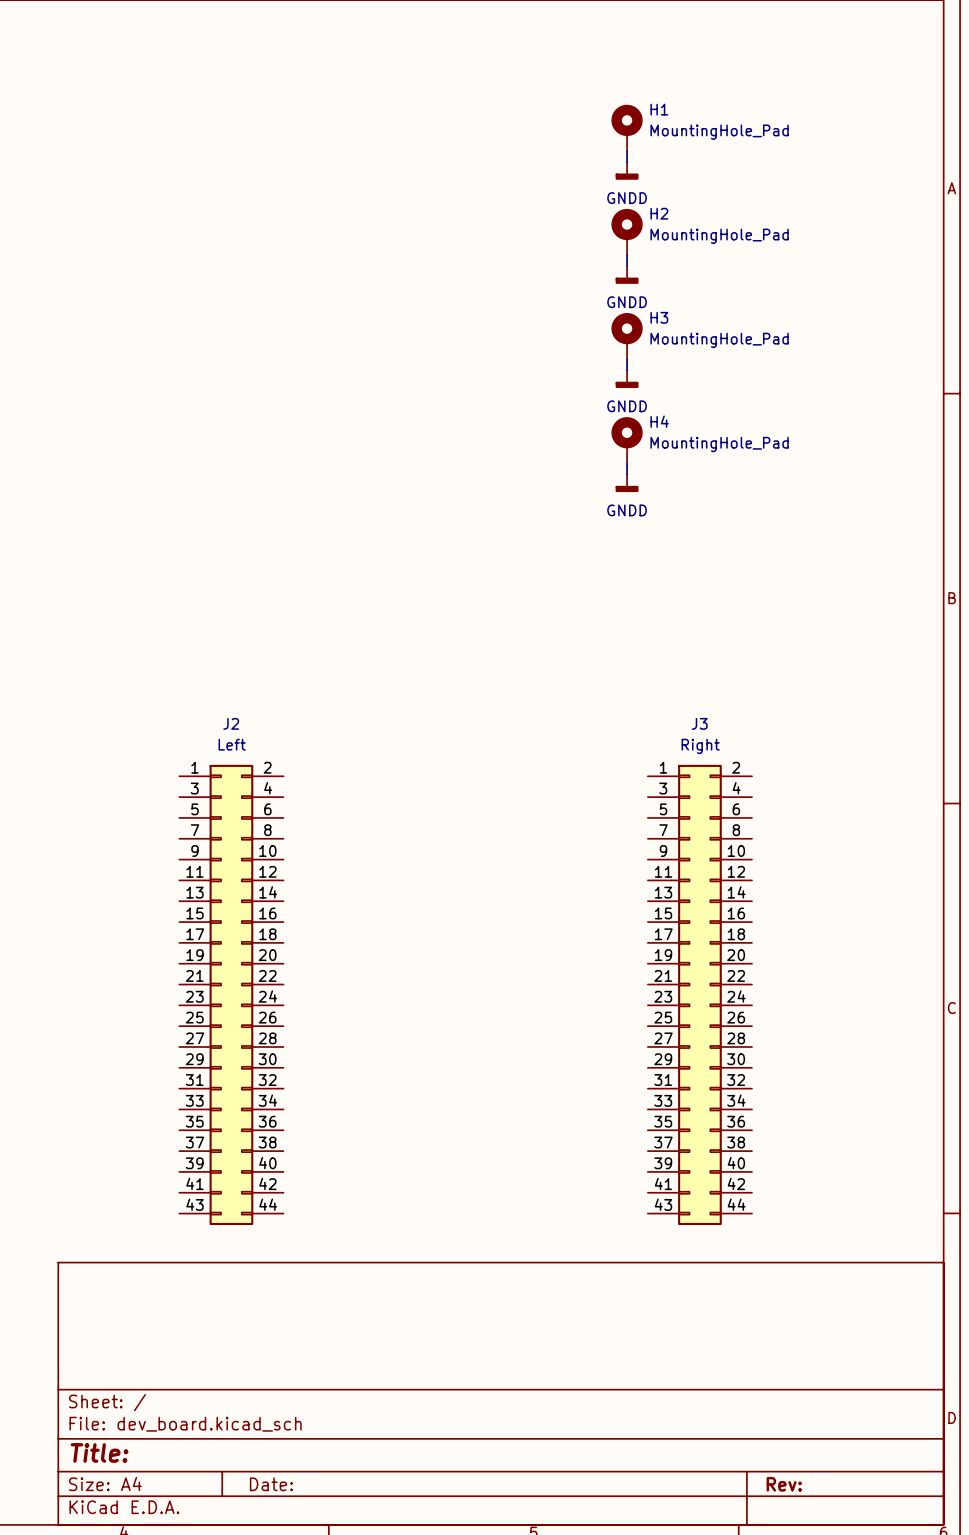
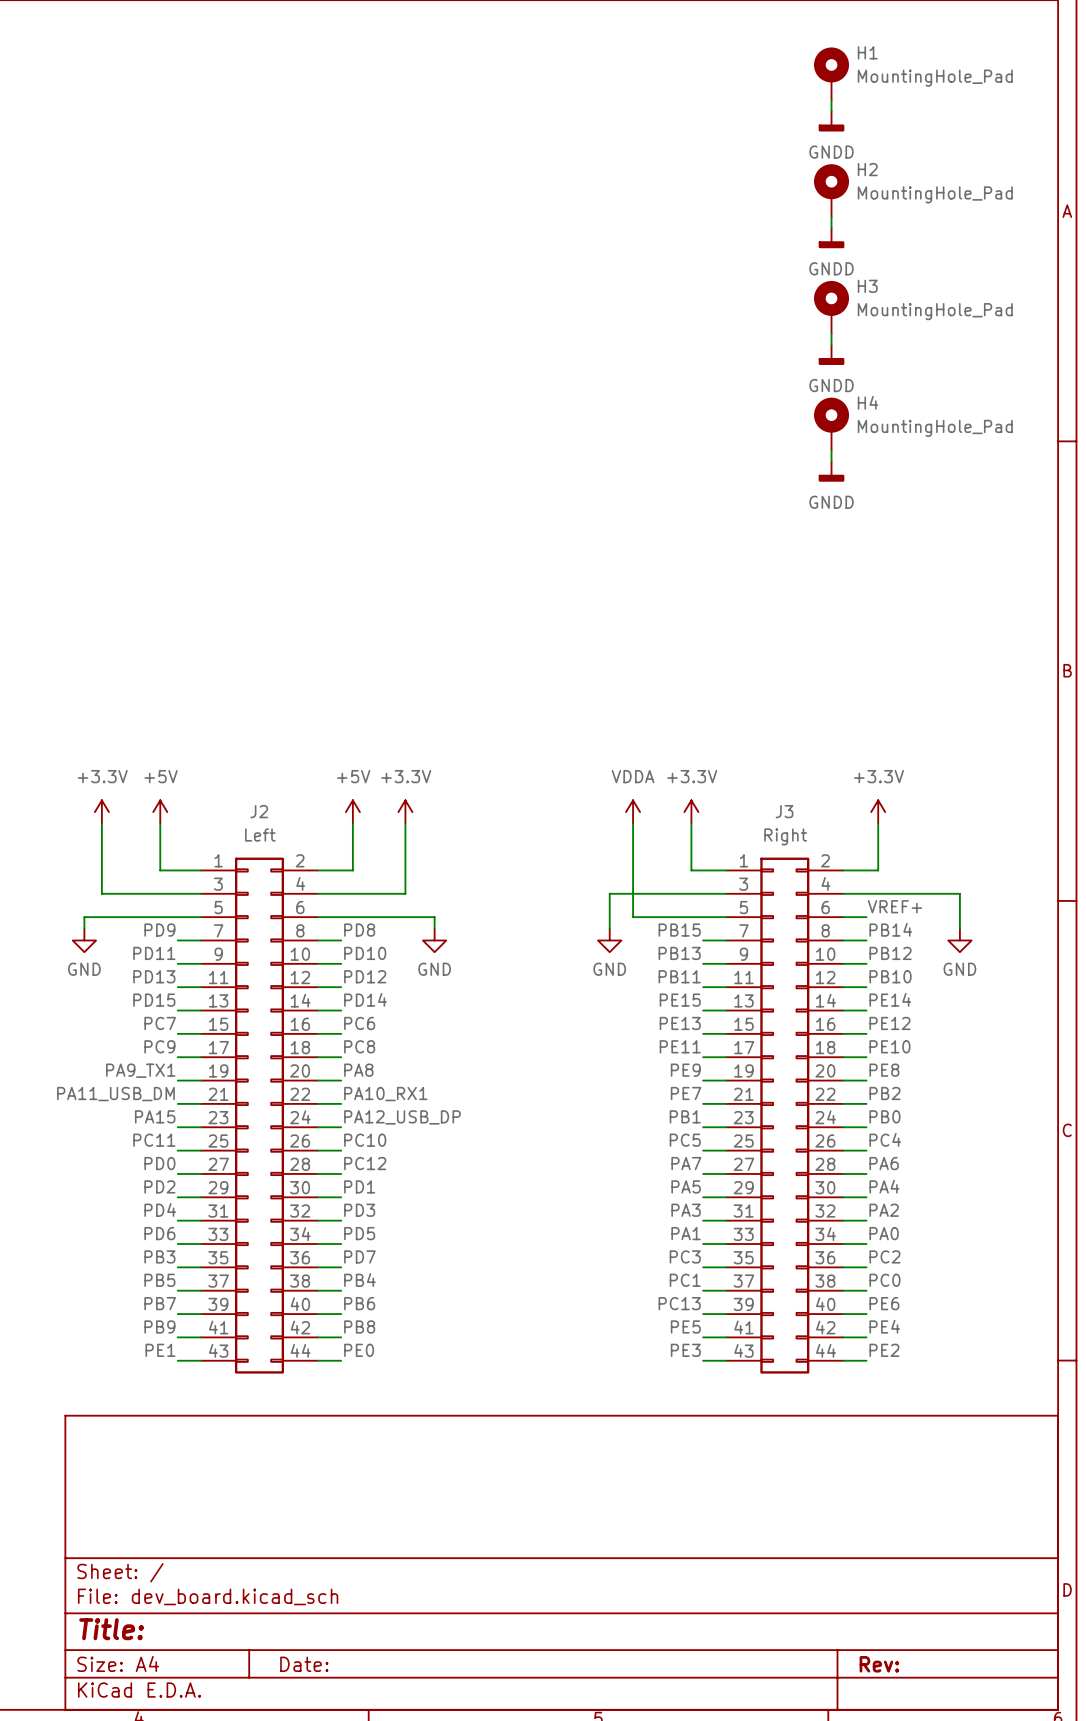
power symbol: none -> GNDD (831, 121)
H1 position: (627, 128) -> (831, 73)
wire: (627, 151) (627, 162) -> (831, 99) (831, 111)
power symbol: GNDD (627, 170) -> none
power symbol: none -> GNDD (831, 238)
H2 position: (627, 232) -> (831, 190)
wire: (627, 255) (627, 266) -> (831, 216) (831, 228)
power symbol: GNDD (627, 275) -> none
power symbol: none -> GNDD (831, 355)
H3 position: (627, 336) -> (831, 307)
wire: (627, 359) (627, 370) -> (831, 333) (831, 345)
power symbol: GNDD (627, 379) -> none
power symbol: none -> GNDD (831, 471)
H4 position: (627, 440) -> (831, 423)
wire: (627, 463) (627, 474) -> (831, 450) (831, 461)
power symbol: GNDD (627, 483) -> none
power symbol: none -> +3.3V (101, 812)
power symbol: none -> +5V (160, 812)
power symbol: none -> +5V (352, 812)
power symbol: none -> +3.3V (405, 812)
power symbol: none -> VDDA (633, 812)
power symbol: none -> +3.3V (691, 812)
power symbol: none -> +3.3V (878, 812)
wire: none -> (101, 823) (101, 893) (201, 893)
wire: none -> (160, 823) (160, 870) (201, 870)
wire: none -> (352, 823) (352, 870) (317, 870)
wire: none -> (405, 823) (405, 893) (317, 893)
wire: none -> (633, 823) (633, 917) (726, 917)
wire: none -> (691, 823) (691, 870) (726, 870)
wire: none -> (878, 823) (878, 870) (843, 870)
wire: none -> (726, 893) (609, 893) (609, 928)
wire: none -> (843, 893) (959, 893) (959, 928)
label: none -> VREF+ (894, 906)
wire: none -> (201, 917) (84, 917) (84, 928)
wire: none -> (317, 917) (434, 917) (434, 928)
wire: none -> (843, 917) (866, 917)
label: none -> PD9 (159, 930)
label: none -> PD8 (359, 930)
label: none -> PB15 (679, 930)
label: none -> PB14 (890, 929)
power symbol: none -> GND (84, 940)
wire: none -> (177, 940) (201, 940)
wire: none -> (317, 940) (341, 940)
power symbol: none -> GND (434, 940)
power symbol: none -> GND (609, 940)
wire: none -> (703, 940) (726, 940)
wire: none -> (843, 940) (866, 940)
power symbol: none -> GND (959, 940)
label: none -> PD11 (154, 953)
label: none -> PD10 (365, 953)
label: none -> PB13 (679, 953)
label: none -> PB12 (890, 953)
wire: none -> (177, 963) (201, 963)
wire: none -> (317, 963) (341, 963)
wire: none -> (703, 963) (726, 963)
wire: none -> (843, 963) (866, 963)
label: none -> PD13 (154, 976)
label: none -> PD12 (365, 976)
label: none -> PB11 (679, 976)
label: none -> PB10 (890, 976)
wire: none -> (177, 987) (201, 987)
wire: none -> (317, 987) (341, 987)
wire: none -> (703, 987) (726, 987)
wire: none -> (843, 987) (866, 987)
label: none -> PD15 (154, 1000)
label: none -> PD14 (365, 999)
label: none -> PE15 (680, 1000)
label: none -> PE14 (890, 999)
wire: none -> (177, 1010) (201, 1010)
wire: none -> (317, 1010) (341, 1010)
wire: none -> (703, 1010) (726, 1010)
wire: none -> (843, 1010) (866, 1010)
label: none -> PC7 (160, 1023)
label: none -> PC6 (359, 1023)
label: none -> PE13 (680, 1023)
label: none -> PE12 (889, 1023)
wire: none -> (177, 1033) (201, 1033)
wire: none -> (317, 1033) (341, 1033)
wire: none -> (703, 1033) (726, 1033)
wire: none -> (843, 1033) (866, 1033)
label: none -> PC9 (159, 1046)
label: none -> PC8 (359, 1046)
label: none -> PE11 (680, 1046)
label: none -> PE10 (889, 1046)
wire: none -> (177, 1057) (201, 1057)
wire: none -> (317, 1057) (341, 1057)
wire: none -> (703, 1057) (726, 1057)
wire: none -> (843, 1057) (866, 1057)
label: none -> PA9_TX1 (140, 1070)
label: none -> PA8 (358, 1070)
label: none -> PE9 (685, 1070)
label: none -> PE8 (884, 1070)
wire: none -> (177, 1080) (201, 1080)
wire: none -> (317, 1080) (341, 1080)
wire: none -> (703, 1080) (726, 1080)
wire: none -> (843, 1080) (866, 1080)
label: none -> PA11_USB_DM (115, 1094)
label: none -> PA10_RX1 (385, 1094)
label: none -> PE7 (686, 1093)
label: none -> PB2 (884, 1093)
wire: none -> (177, 1103) (201, 1103)
wire: none -> (317, 1103) (341, 1103)
wire: none -> (703, 1103) (726, 1103)
wire: none -> (843, 1103) (866, 1103)
label: none -> PA15 (155, 1116)
label: none -> PA12_USB_DP (402, 1117)
label: none -> PB1 (685, 1116)
label: none -> PB0 (884, 1116)
wire: none -> (177, 1127) (201, 1127)
wire: none -> (317, 1127) (341, 1127)
wire: none -> (703, 1127) (726, 1127)
wire: none -> (843, 1127) (866, 1127)
label: none -> PC11 (154, 1140)
label: none -> PC10 (365, 1140)
label: none -> PC5 (685, 1140)
label: none -> PC4 (885, 1139)
wire: none -> (177, 1150) (201, 1150)
wire: none -> (317, 1150) (341, 1150)
wire: none -> (703, 1150) (726, 1150)
wire: none -> (843, 1150) (866, 1150)
label: none -> PD0 (159, 1163)
label: none -> PC12 (365, 1163)
label: none -> PA7 (686, 1163)
label: none -> PA6 (884, 1163)
wire: none -> (177, 1173) (201, 1173)
wire: none -> (317, 1173) (341, 1173)
wire: none -> (703, 1173) (726, 1173)
wire: none -> (843, 1173) (866, 1173)
label: none -> PD2 (159, 1186)
label: none -> PD1 (359, 1186)
label: none -> PA5 (686, 1186)
label: none -> PA4 (884, 1186)
wire: none -> (177, 1197) (201, 1197)
wire: none -> (317, 1197) (341, 1197)
wire: none -> (703, 1197) (726, 1197)
wire: none -> (843, 1197) (866, 1197)
label: none -> PD4 (160, 1209)
label: none -> PD3 (359, 1210)
label: none -> PA3 (686, 1210)
label: none -> PA2 (884, 1210)
wire: none -> (177, 1220) (201, 1220)
wire: none -> (317, 1220) (341, 1220)
wire: none -> (703, 1220) (726, 1220)
wire: none -> (843, 1220) (866, 1220)
label: none -> PD6 (159, 1233)
label: none -> PD5 (359, 1233)
label: none -> PA1 (686, 1233)
label: none -> PA0 (884, 1233)
wire: none -> (177, 1244) (201, 1244)
wire: none -> (317, 1244) (341, 1244)
wire: none -> (703, 1244) (726, 1244)
wire: none -> (843, 1244) (866, 1244)
label: none -> PB3 (159, 1256)
label: none -> PD7 (359, 1256)
label: none -> PC3 (685, 1256)
label: none -> PC2 (884, 1256)
wire: none -> (177, 1267) (201, 1267)
wire: none -> (317, 1267) (341, 1267)
wire: none -> (703, 1267) (726, 1267)
wire: none -> (843, 1267) (866, 1267)
label: none -> PB5 (159, 1280)
label: none -> PB4 (359, 1280)
label: none -> PC1 (685, 1280)
label: none -> PC0 (884, 1280)
wire: none -> (177, 1290) (201, 1290)
wire: none -> (317, 1290) (341, 1290)
wire: none -> (703, 1290) (726, 1290)
wire: none -> (843, 1290) (866, 1290)
label: none -> PB7 (160, 1303)
label: none -> PB6 (359, 1303)
label: none -> PC13 (679, 1303)
label: none -> PE6 (884, 1303)
wire: none -> (177, 1314) (201, 1314)
wire: none -> (317, 1314) (341, 1314)
wire: none -> (703, 1314) (726, 1314)
wire: none -> (843, 1314) (866, 1314)
label: none -> PB9 (159, 1326)
label: none -> PB8 (359, 1326)
label: none -> PE5 (685, 1326)
label: none -> PE4 (884, 1326)
wire: none -> (177, 1337) (201, 1337)
wire: none -> (317, 1337) (341, 1337)
wire: none -> (703, 1337) (726, 1337)
wire: none -> (843, 1337) (866, 1337)
label: none -> PE1 (160, 1350)
label: none -> PE0 (359, 1350)
label: none -> PE3 (685, 1350)
label: none -> PE2 (884, 1350)
wire: none -> (177, 1360) (201, 1360)
wire: none -> (317, 1360) (341, 1360)
wire: none -> (703, 1360) (726, 1360)
wire: none -> (843, 1360) (866, 1360)

